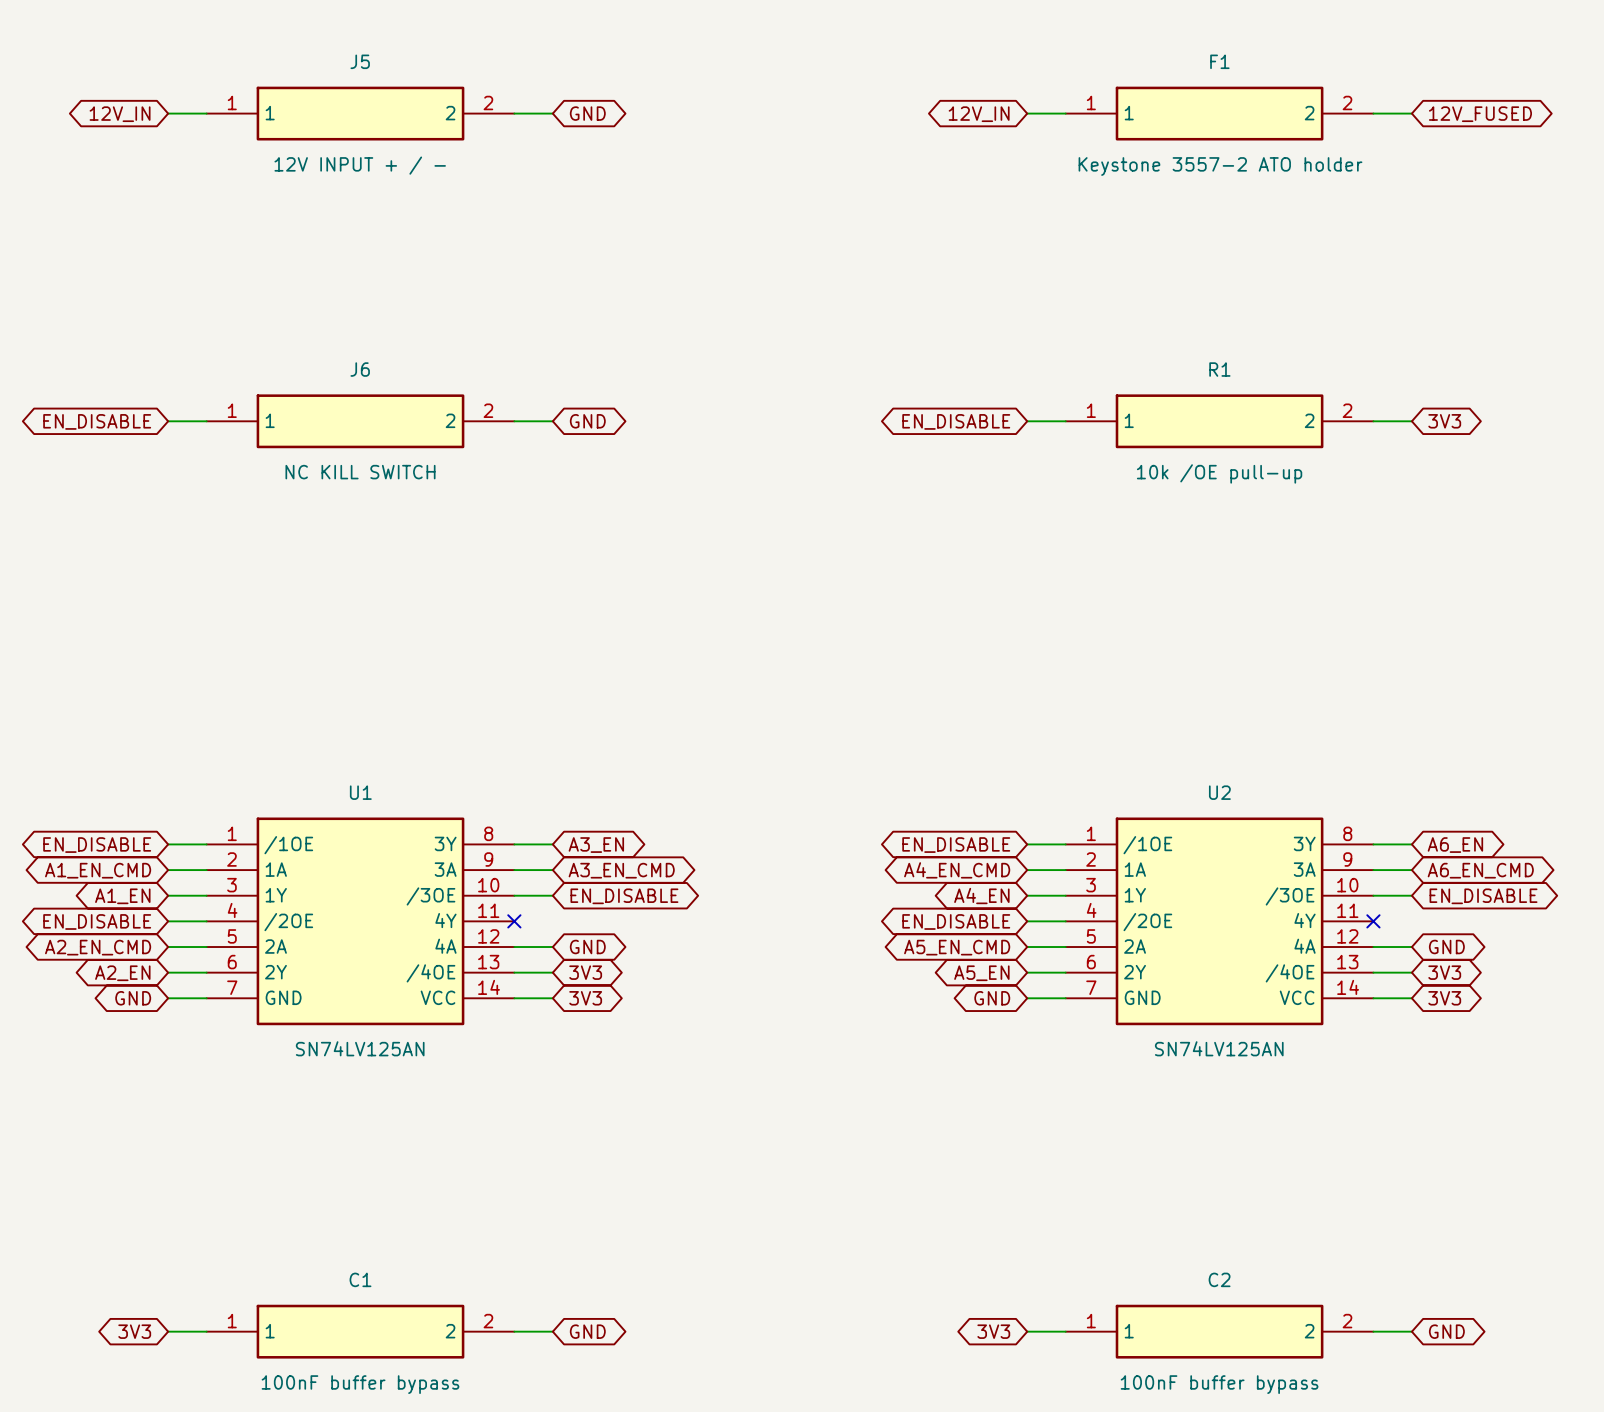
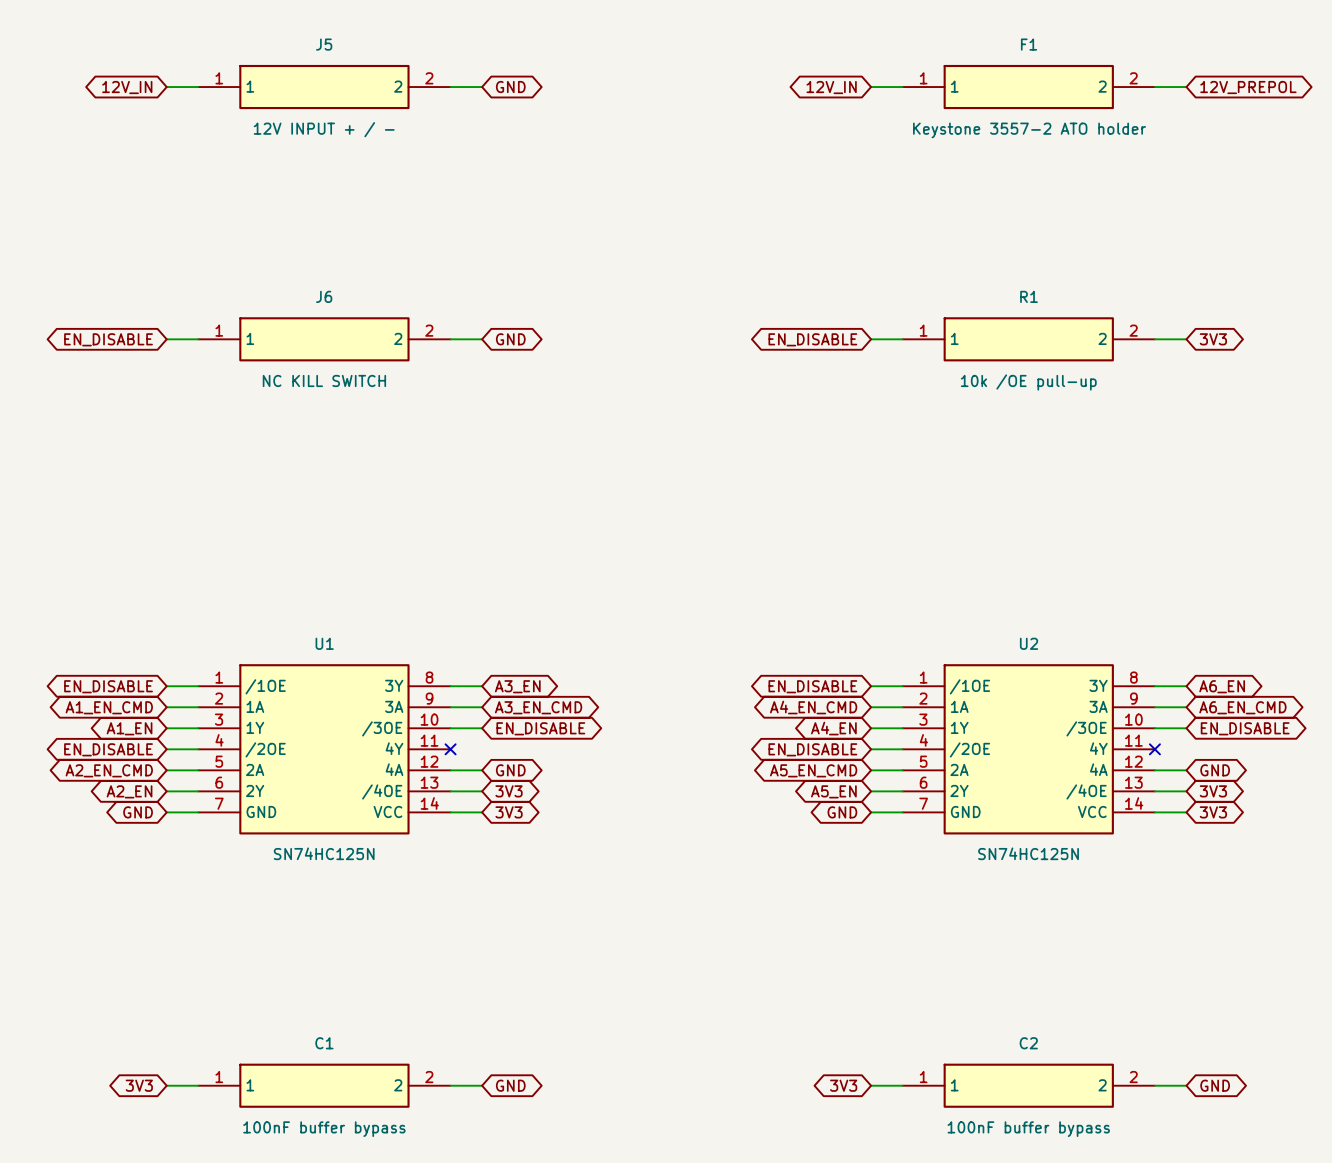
global label: 12V_FUSED (1480, 114) -> 12V_PREPOL (1248, 87)
U1 value: SN74LV125AN (360, 1048) -> SN74HC125N (324, 853)
U2 value: SN74LV125AN (1219, 1048) -> SN74HC125N (1028, 853)

